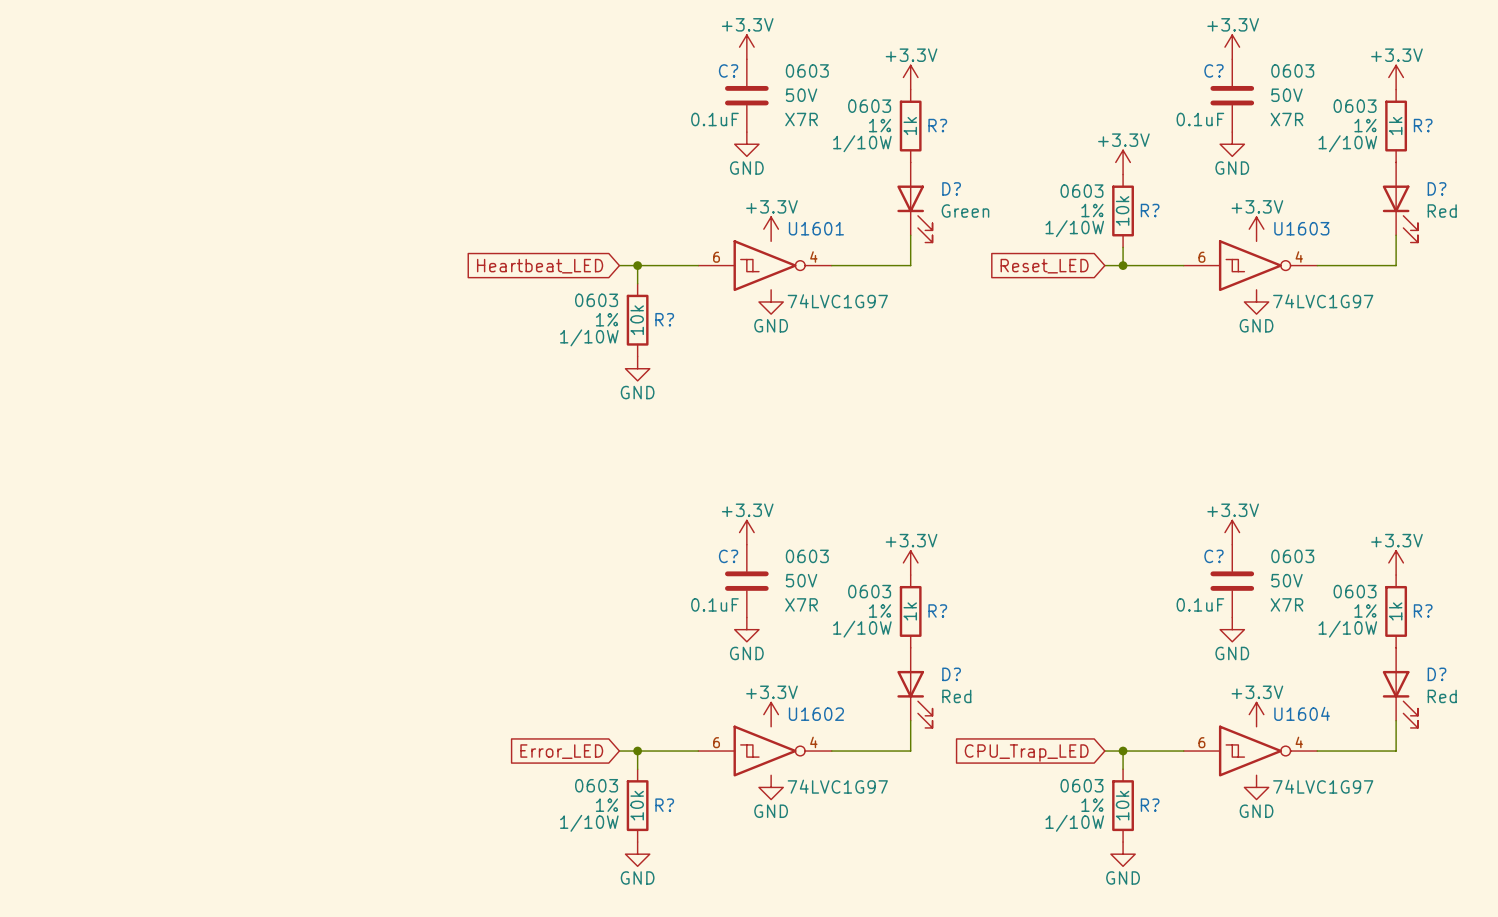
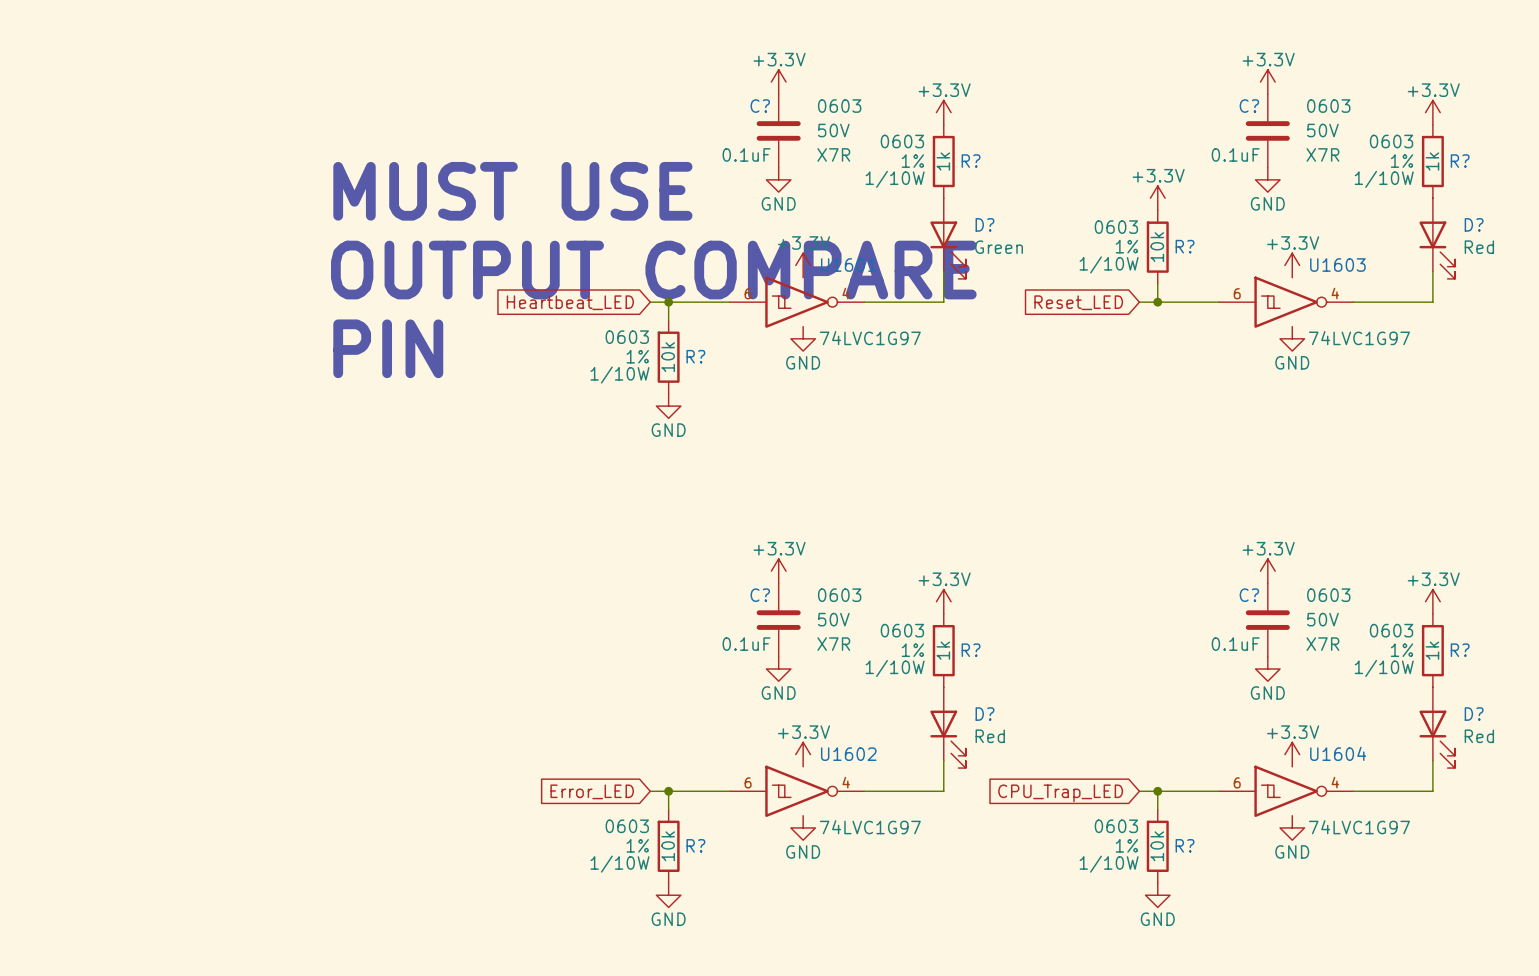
text: none -> MUST USE (512, 191)
text: none -> OUTPUT COMPARE (653, 270)
text: none -> PIN (388, 348)

